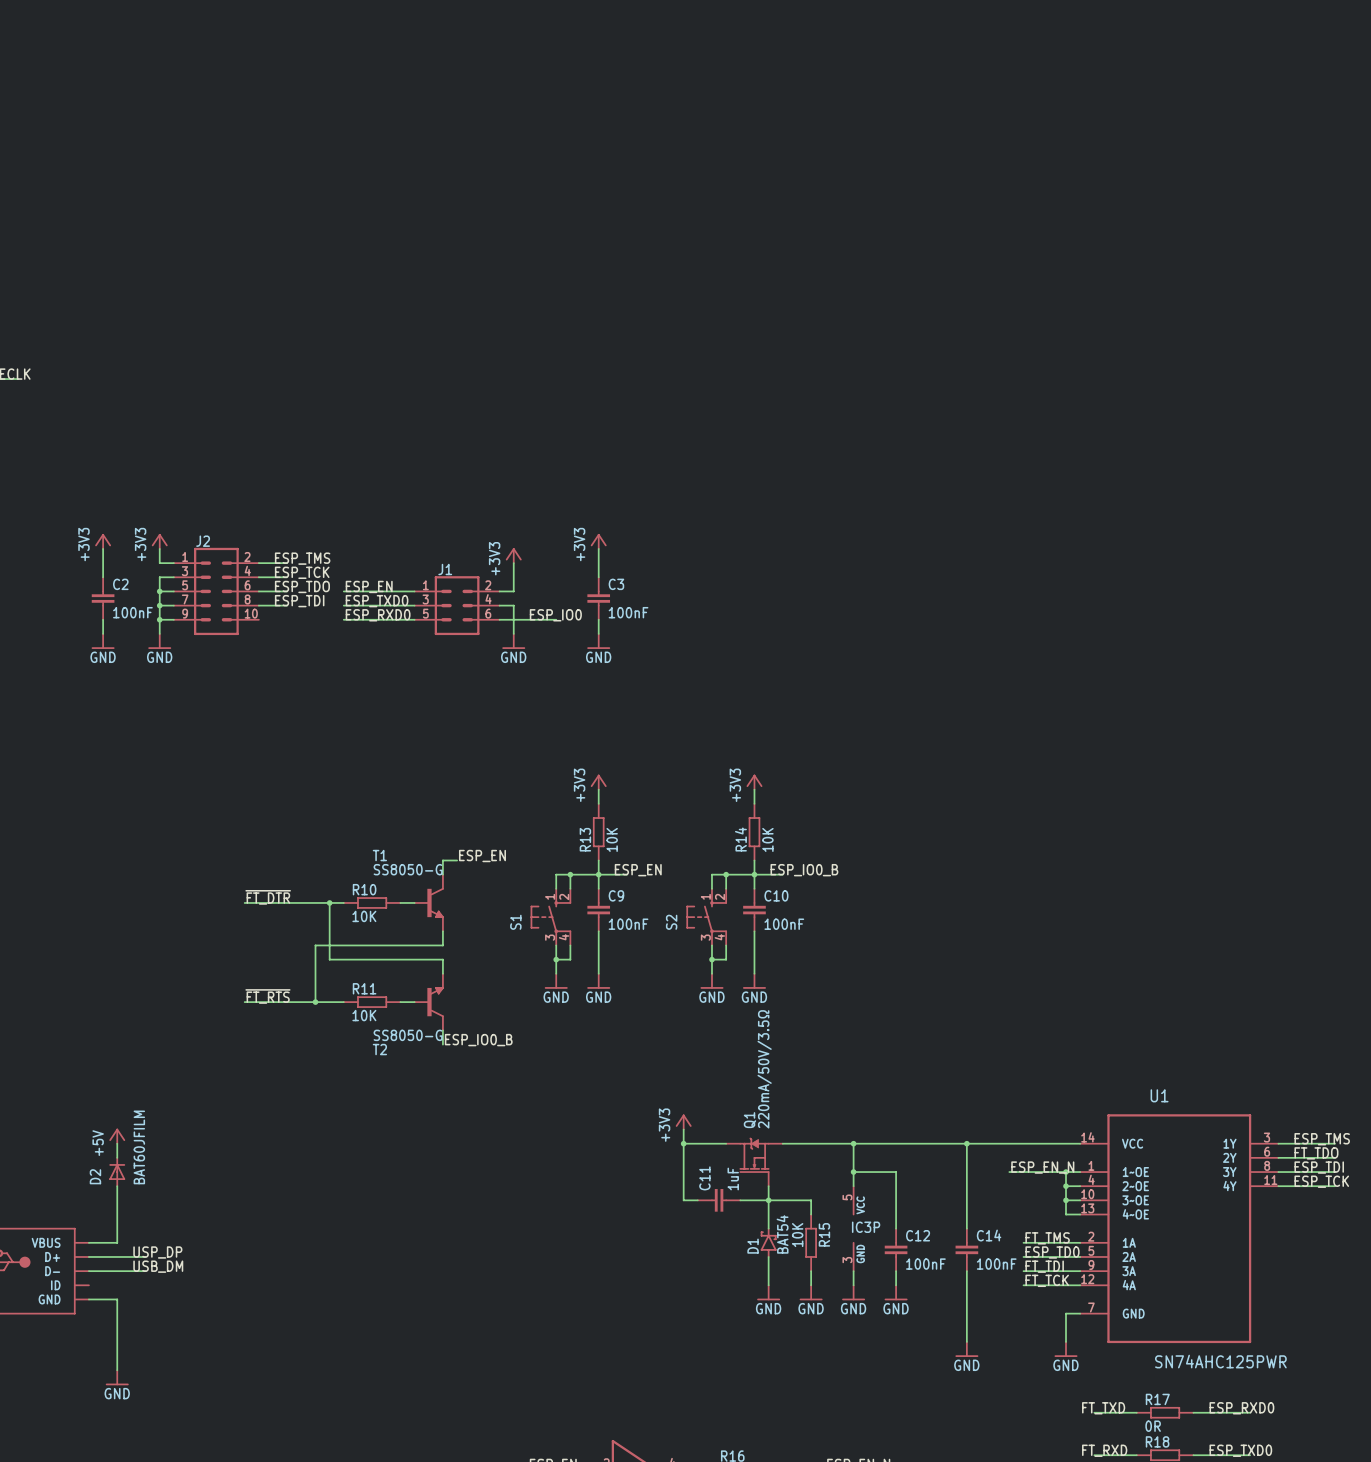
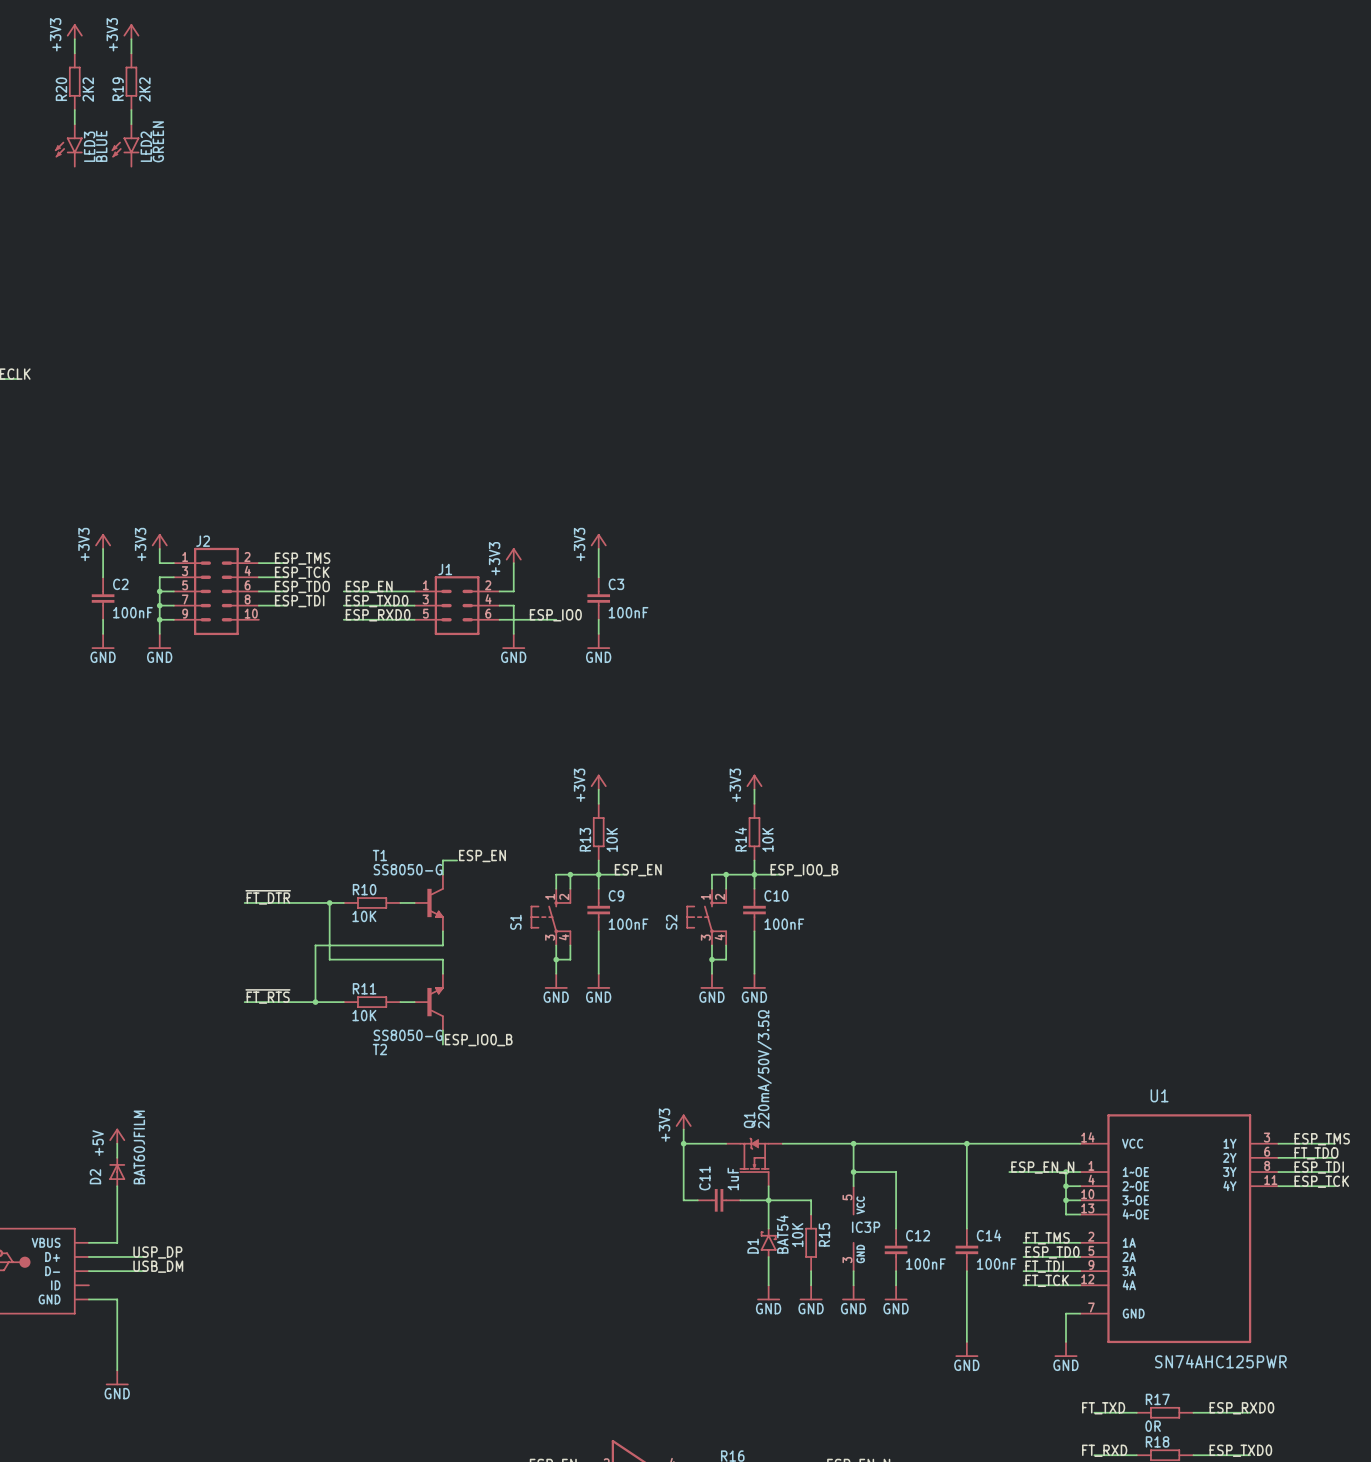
power symbol: none -> +3V3 (74, 31)
power symbol: none -> +3V3 (131, 31)
wire: none -> (74, 39) (74, 53)
wire: none -> (131, 39) (131, 53)
R20: none -> 2K2 (74, 81)
R19: none -> 2K2 (131, 81)
wire: none -> (74, 109) (74, 124)
wire: none -> (131, 109) (131, 124)
LED3: none -> BLUE (68, 145)
LED2: none -> GREEN (125, 145)

